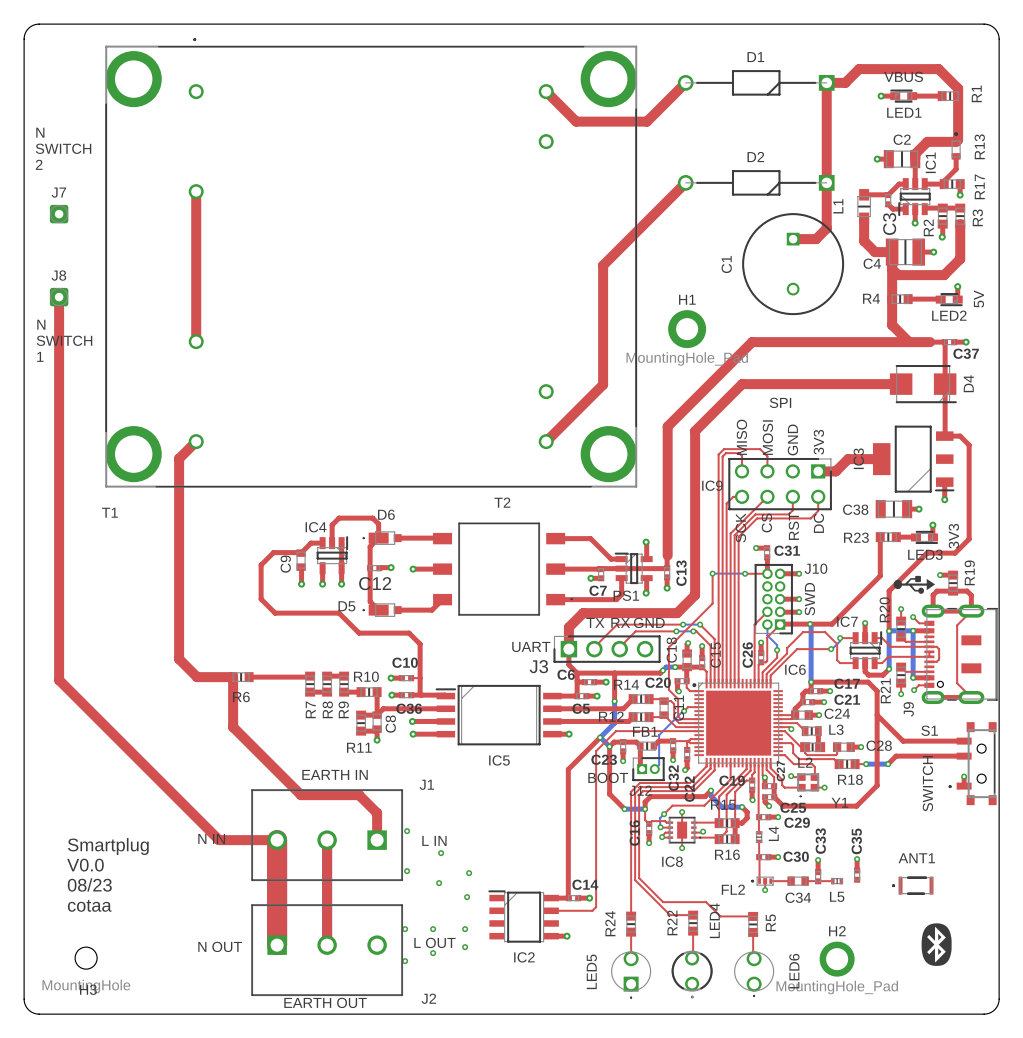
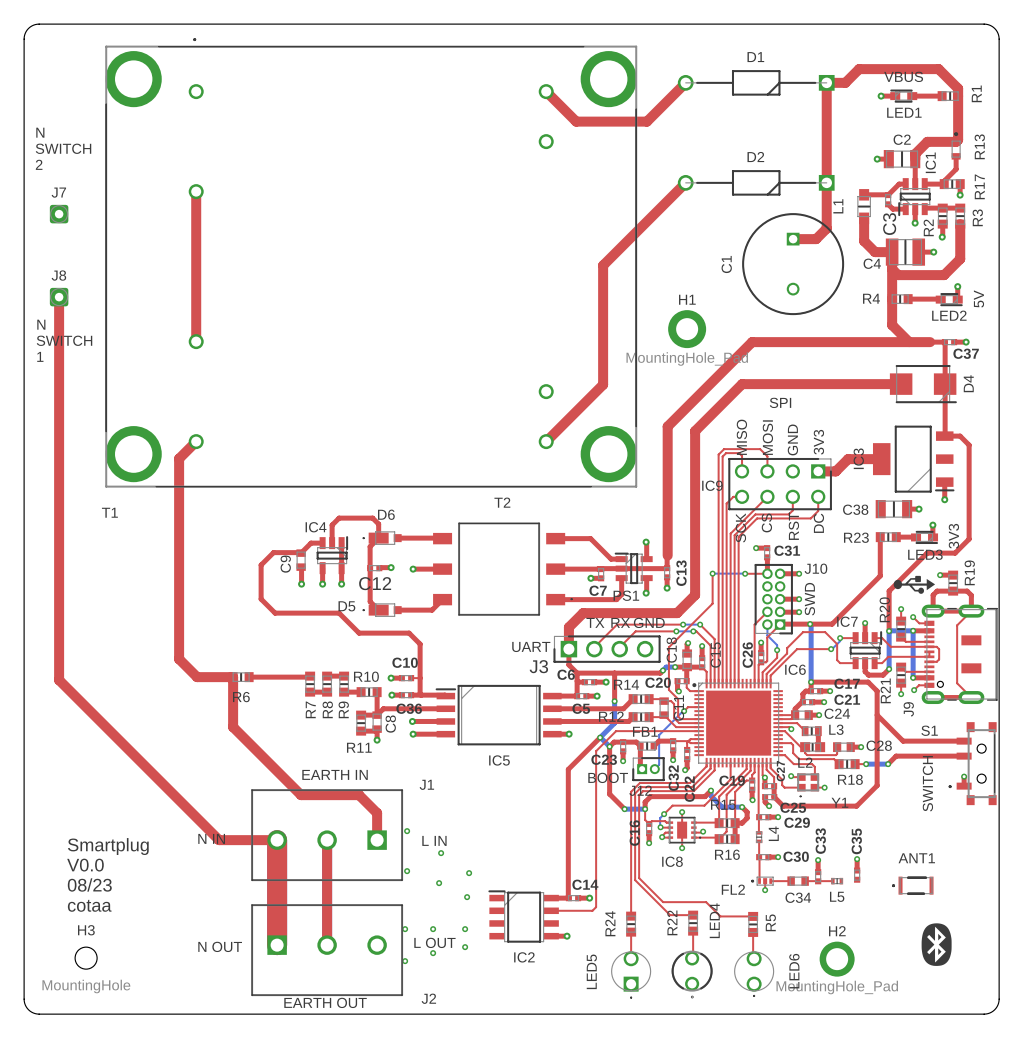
H3 name position: H3 (88, 989) -> H3 (86, 930)

